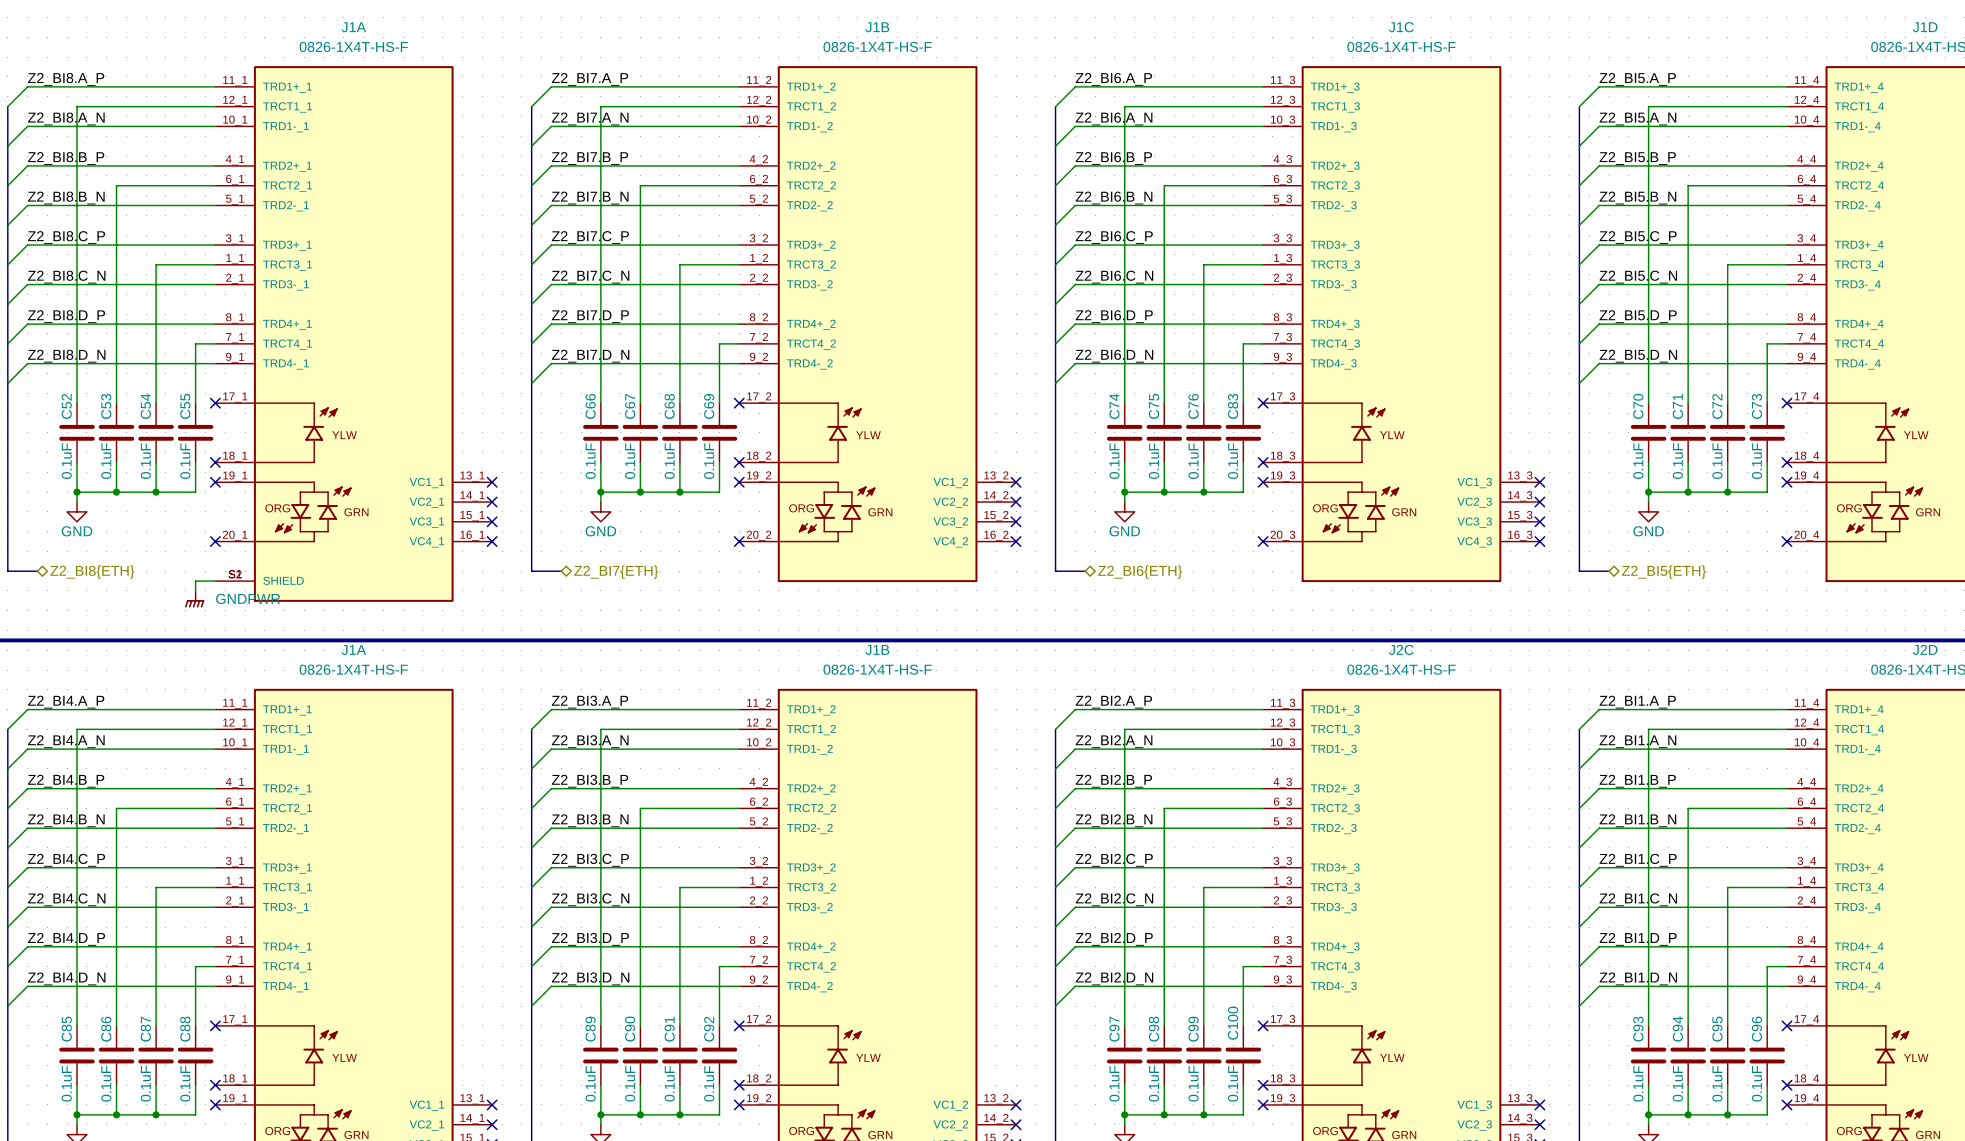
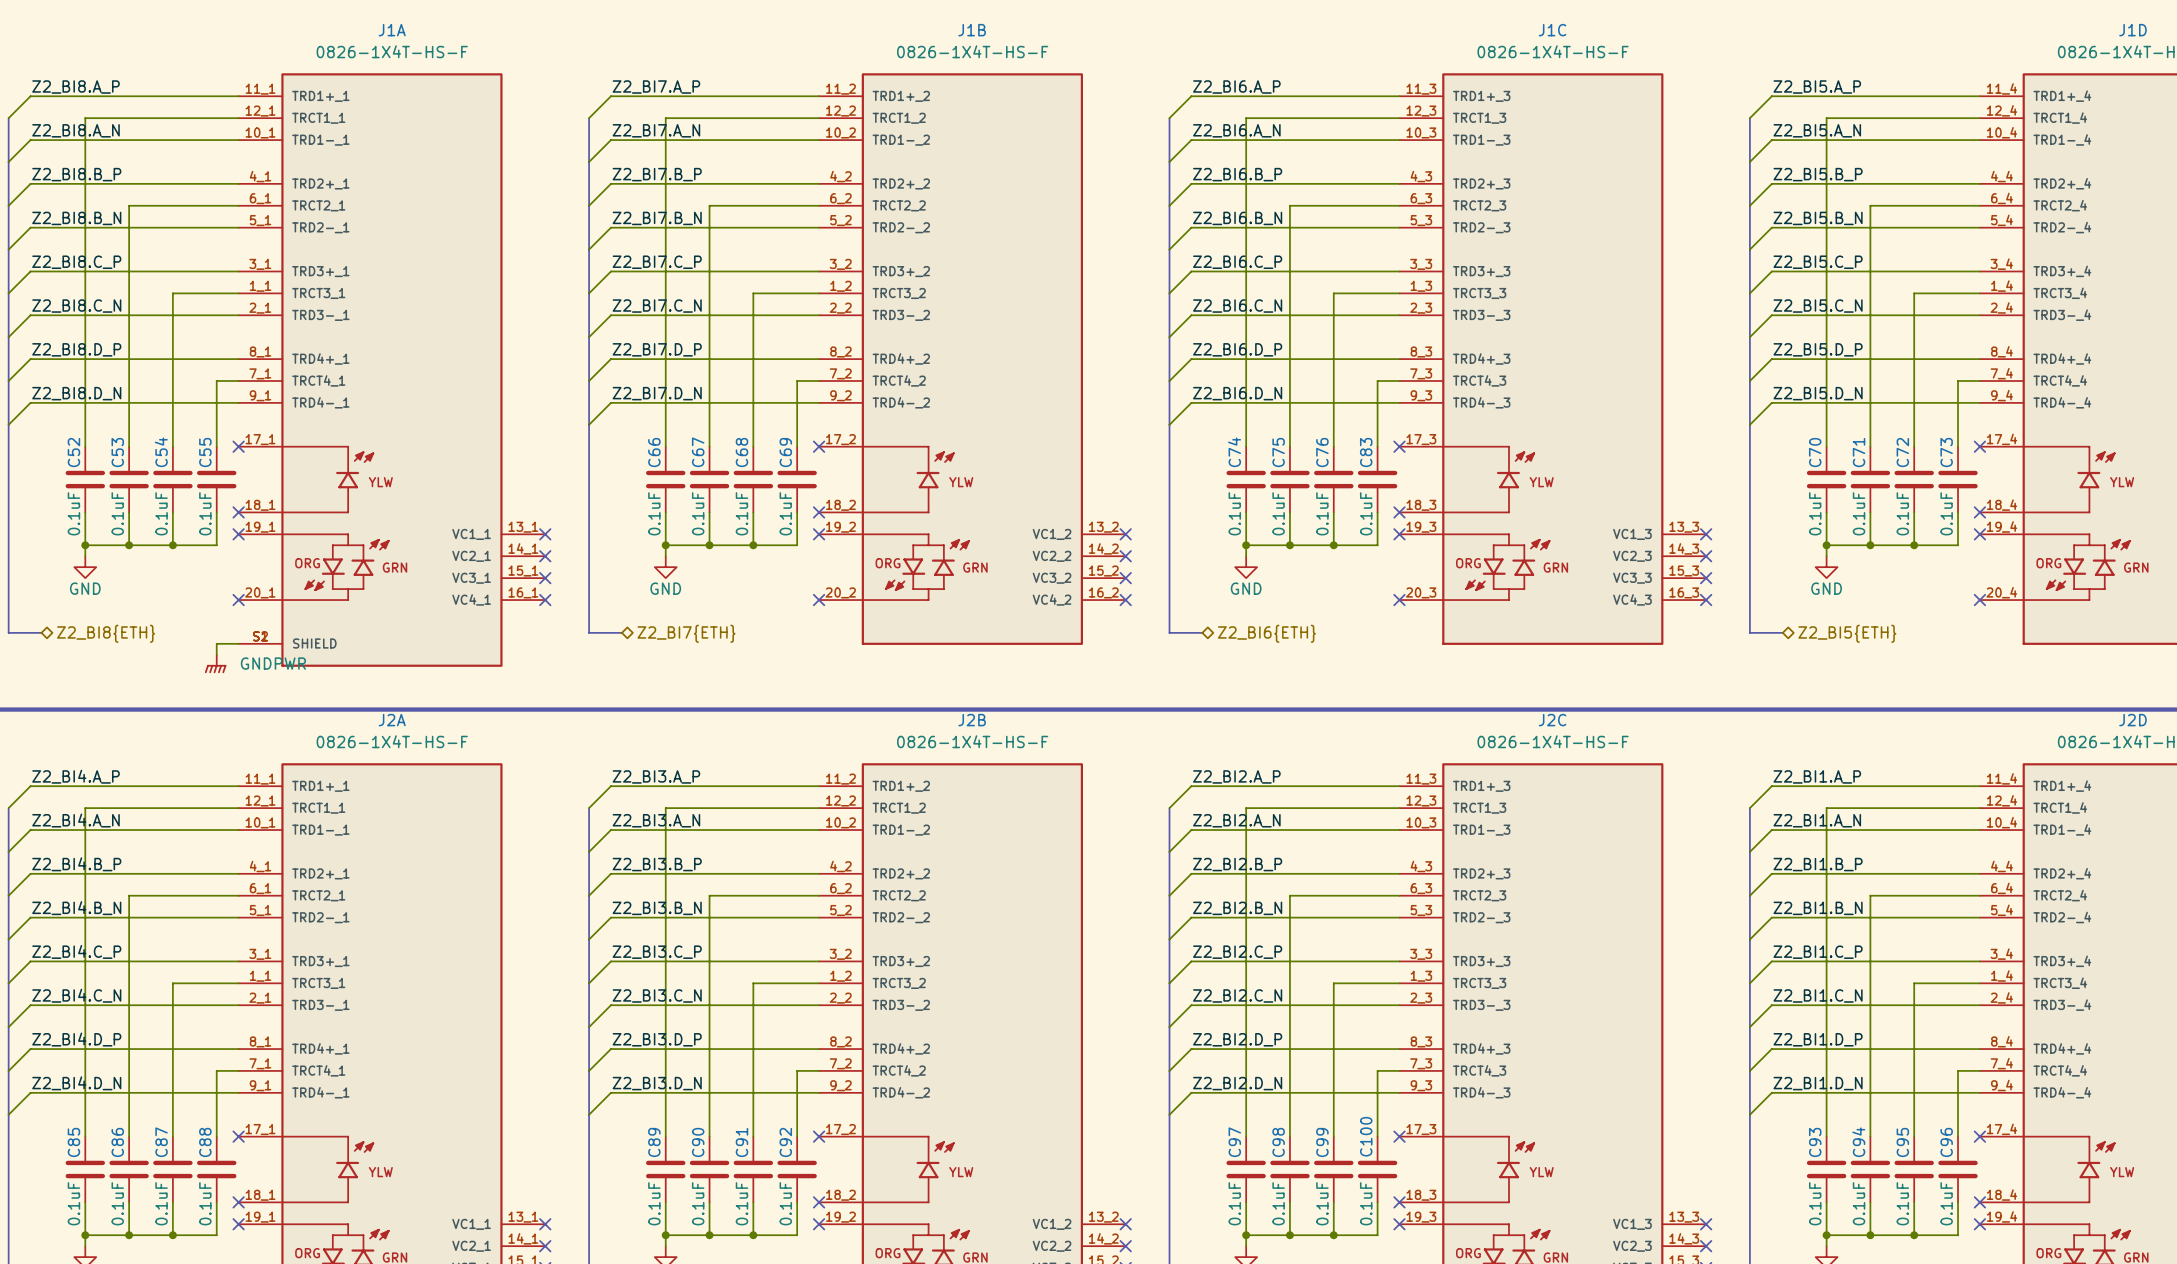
J1A name: J1A (353, 649) -> J2A (392, 720)
J1B name: J1B (877, 649) -> J2B (972, 720)

